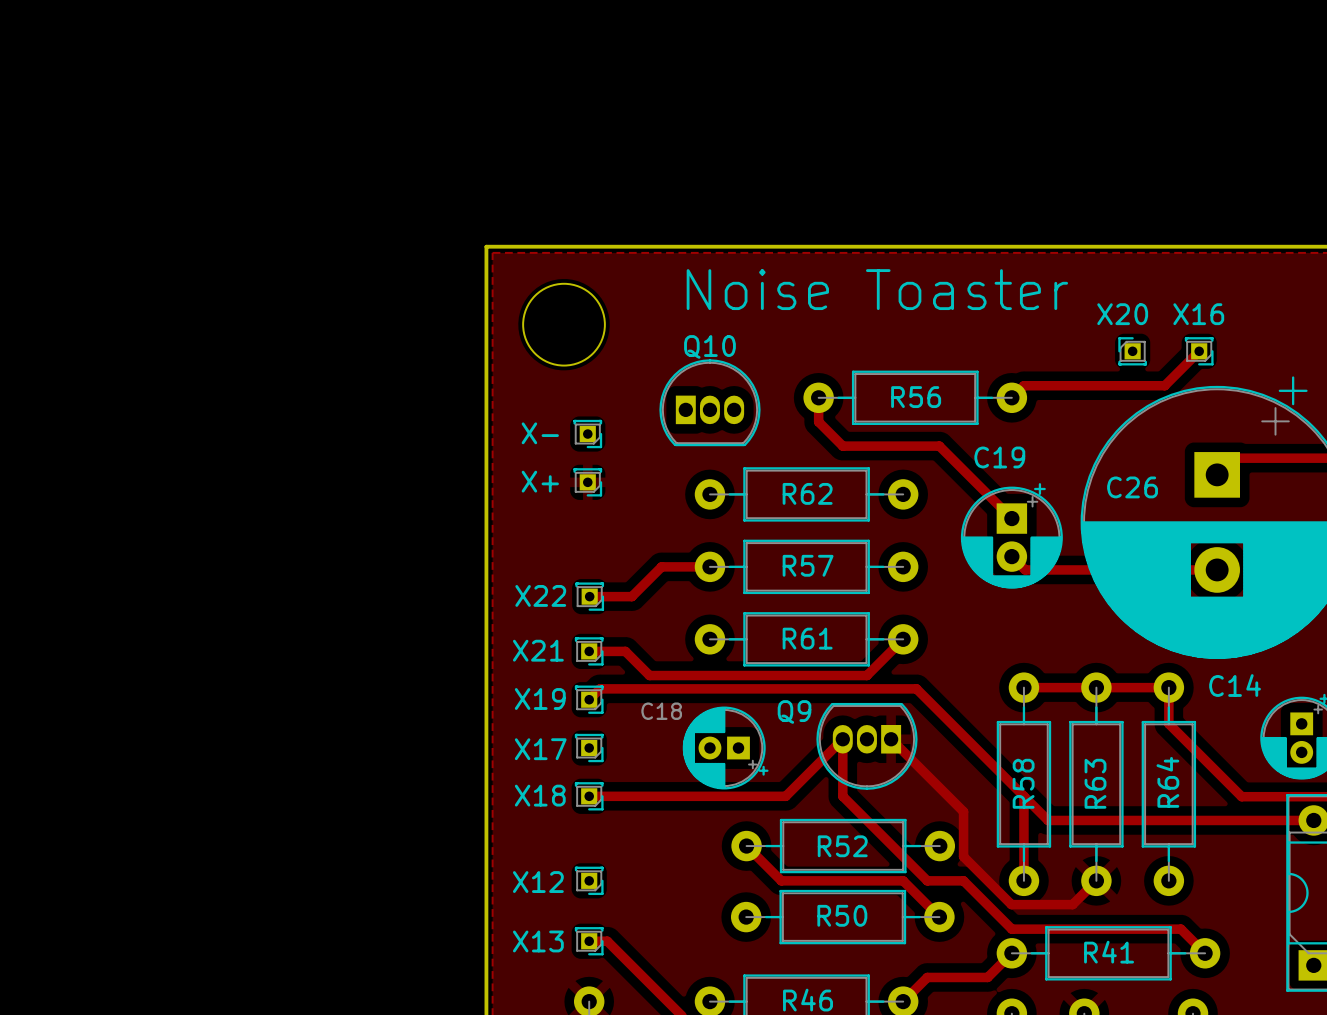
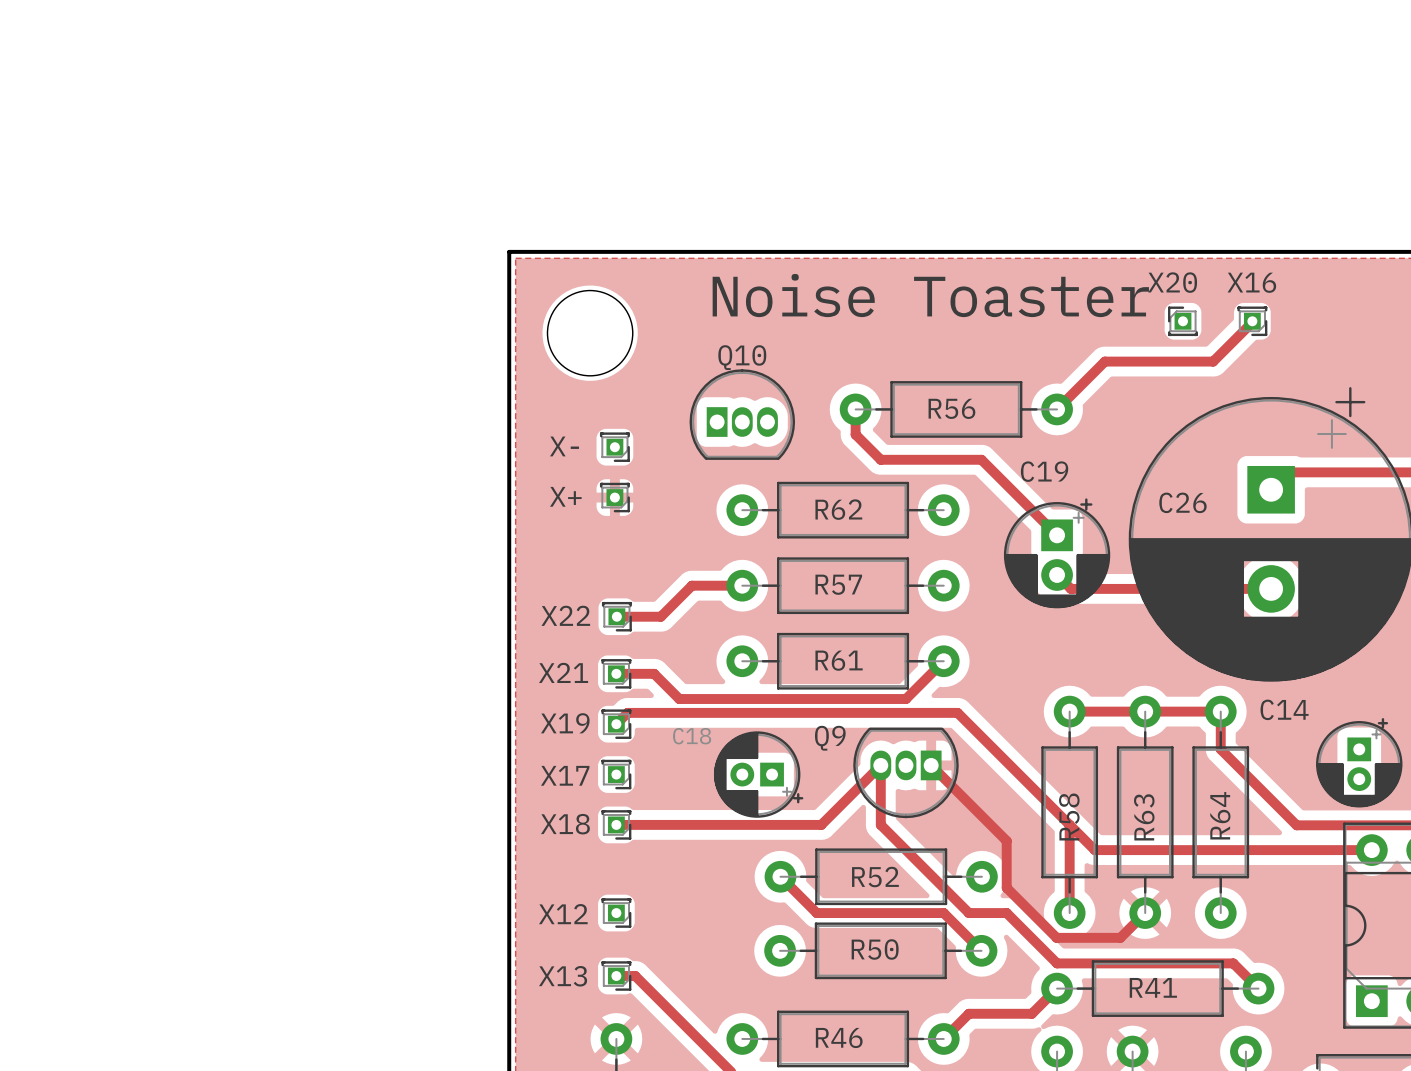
X20 position: (1132, 351) -> (1182, 321)
track: (1199, 351) (1164, 385) (1023, 385) -> (1252, 321) (1213, 361) (1104, 361) (1069, 396)
X16 position: (1199, 351) -> (1252, 321)

